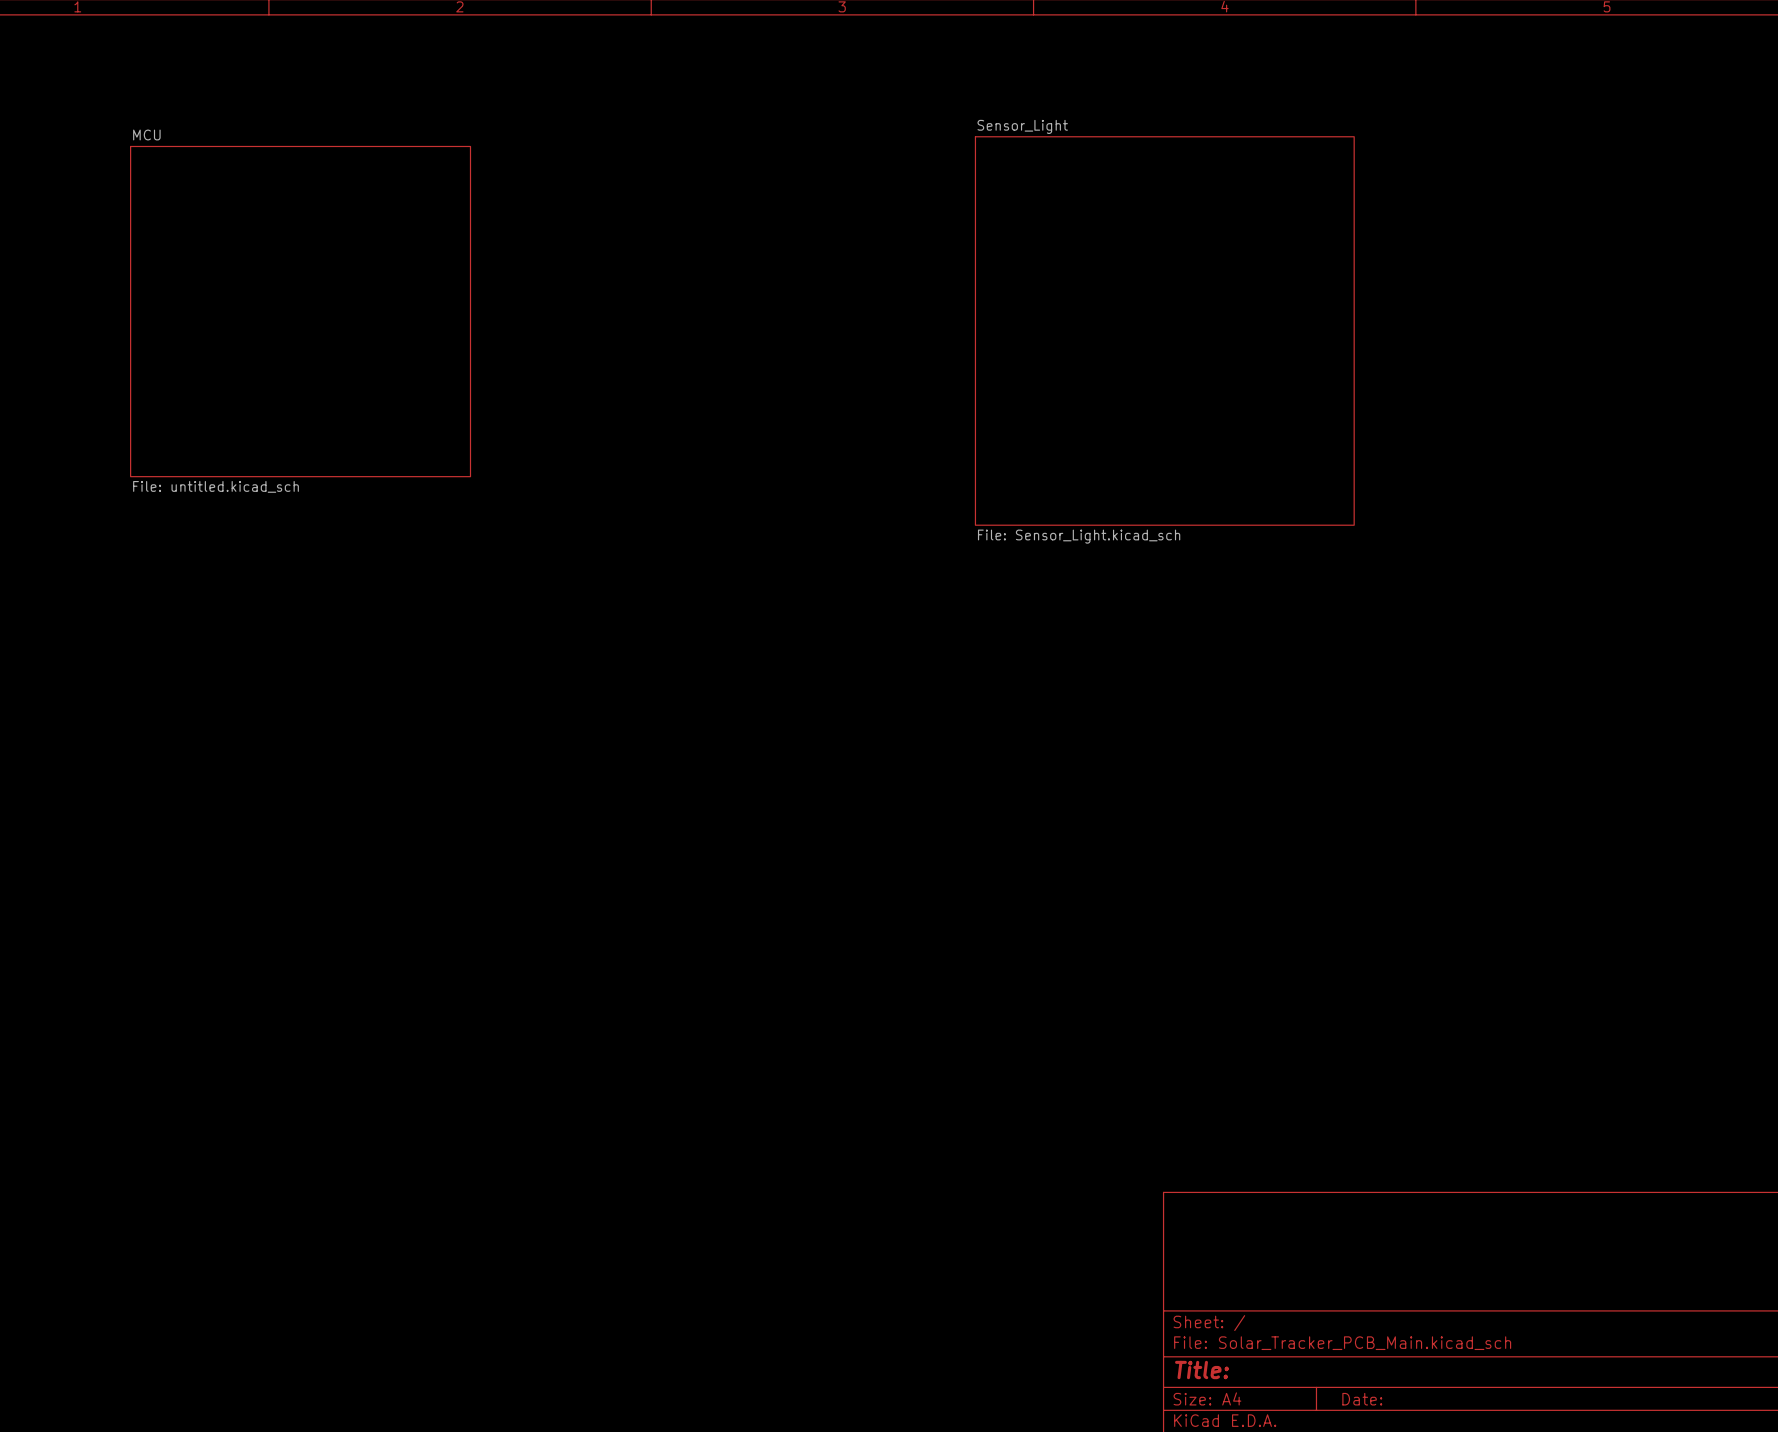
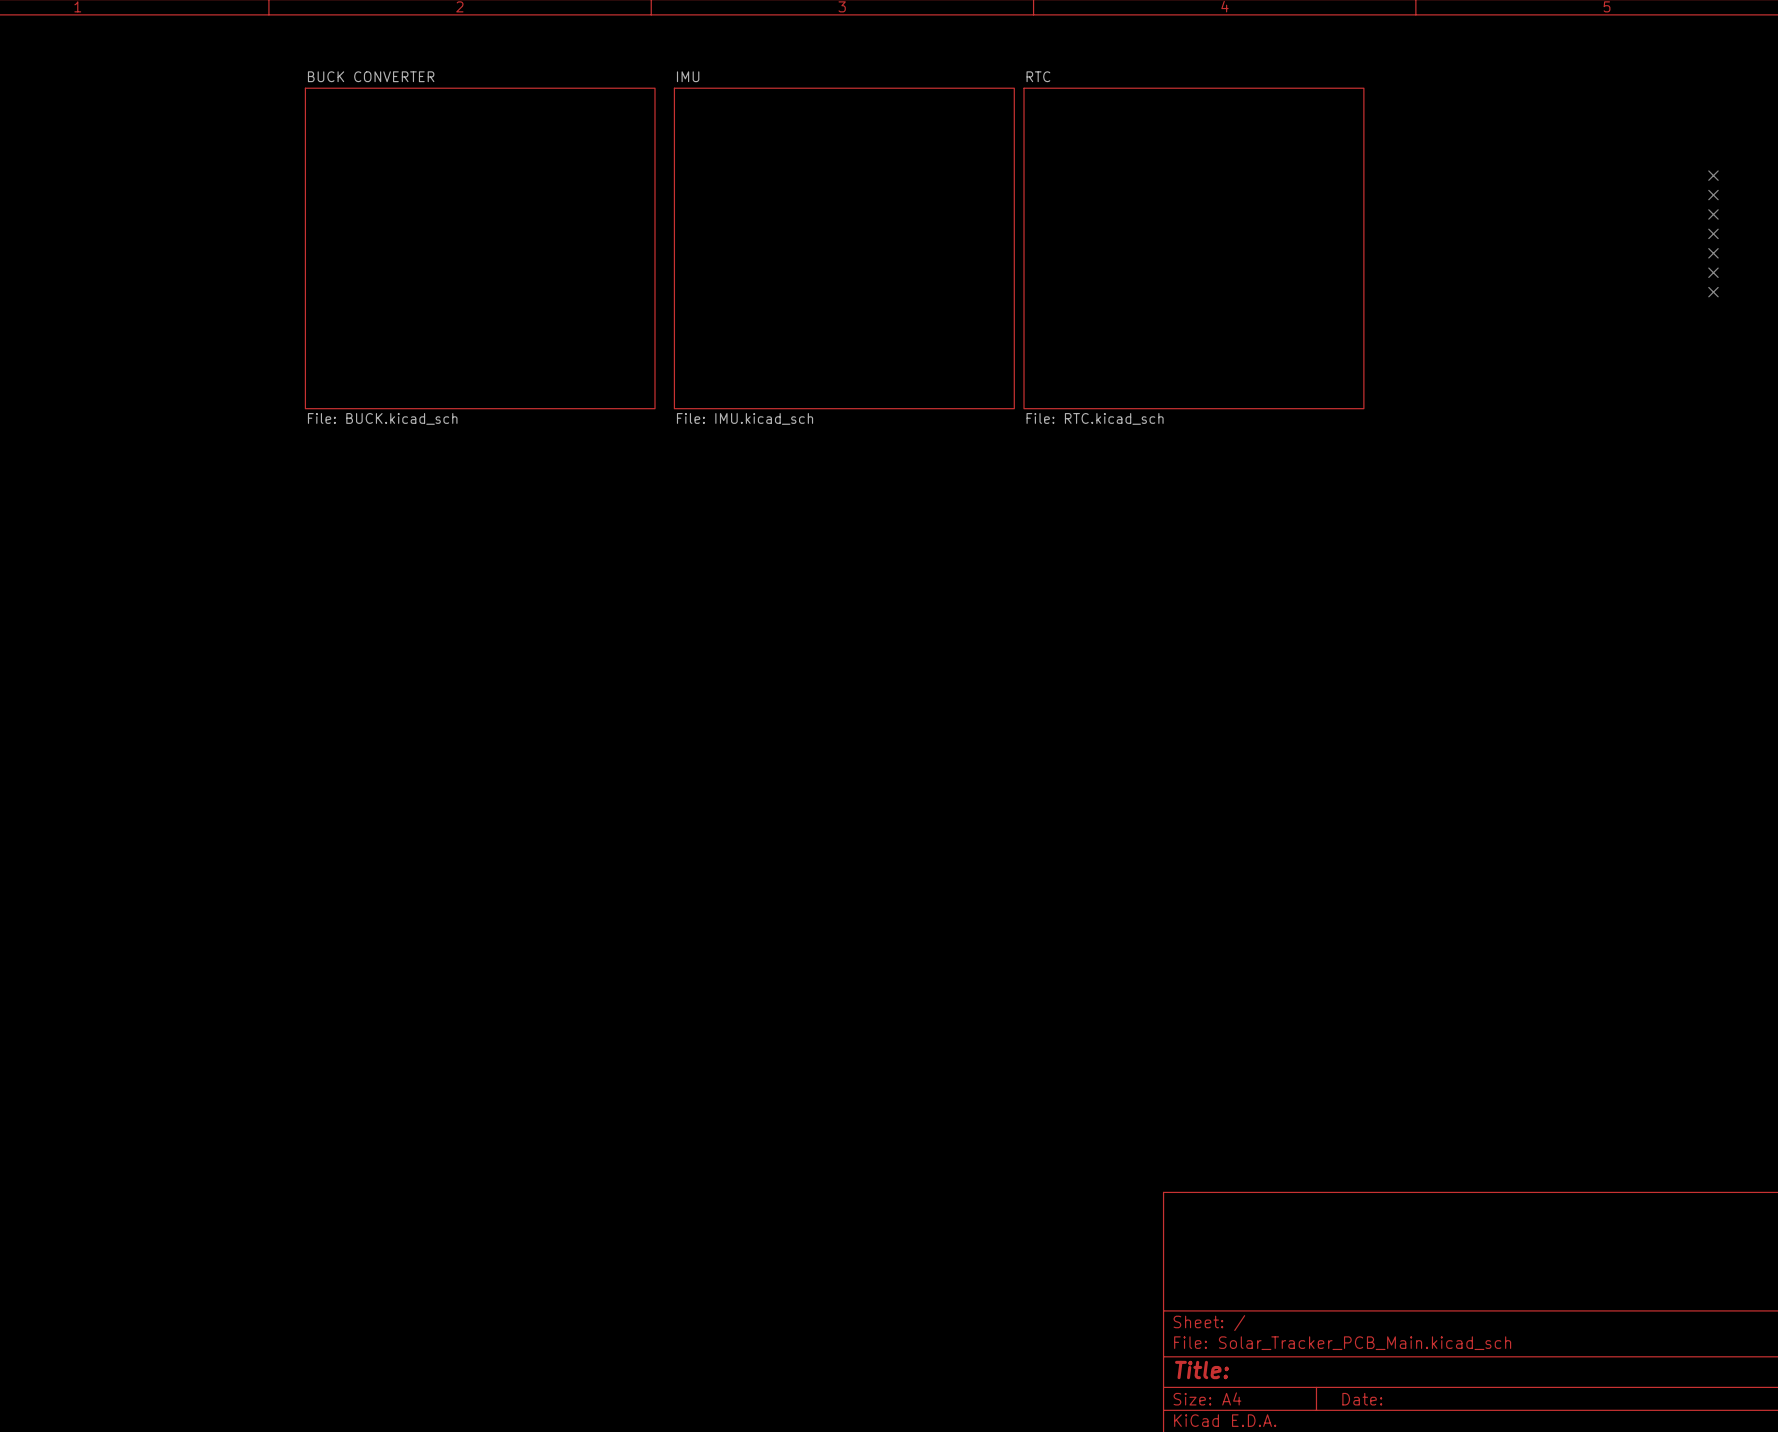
no-connect mark: none -> (1713, 175)
no-connect mark: none -> (1713, 195)
no-connect mark: none -> (1713, 214)
no-connect mark: none -> (1713, 233)
sheet BUCK CONVERTER: none -> File: BUCK.kicad_sch (480, 248)
sheet IMU: none -> File: IMU.kicad_sch (844, 248)
sheet RTC: none -> File: RTC.kicad_sch (1193, 248)
no-connect mark: none -> (1713, 253)
no-connect mark: none -> (1713, 272)
no-connect mark: none -> (1713, 292)
sheet MCU: File: untitled.kicad_sch (300, 311) -> none
sheet Sensor_Light: File: Sensor_Light.kicad_sch (1164, 330) -> none

